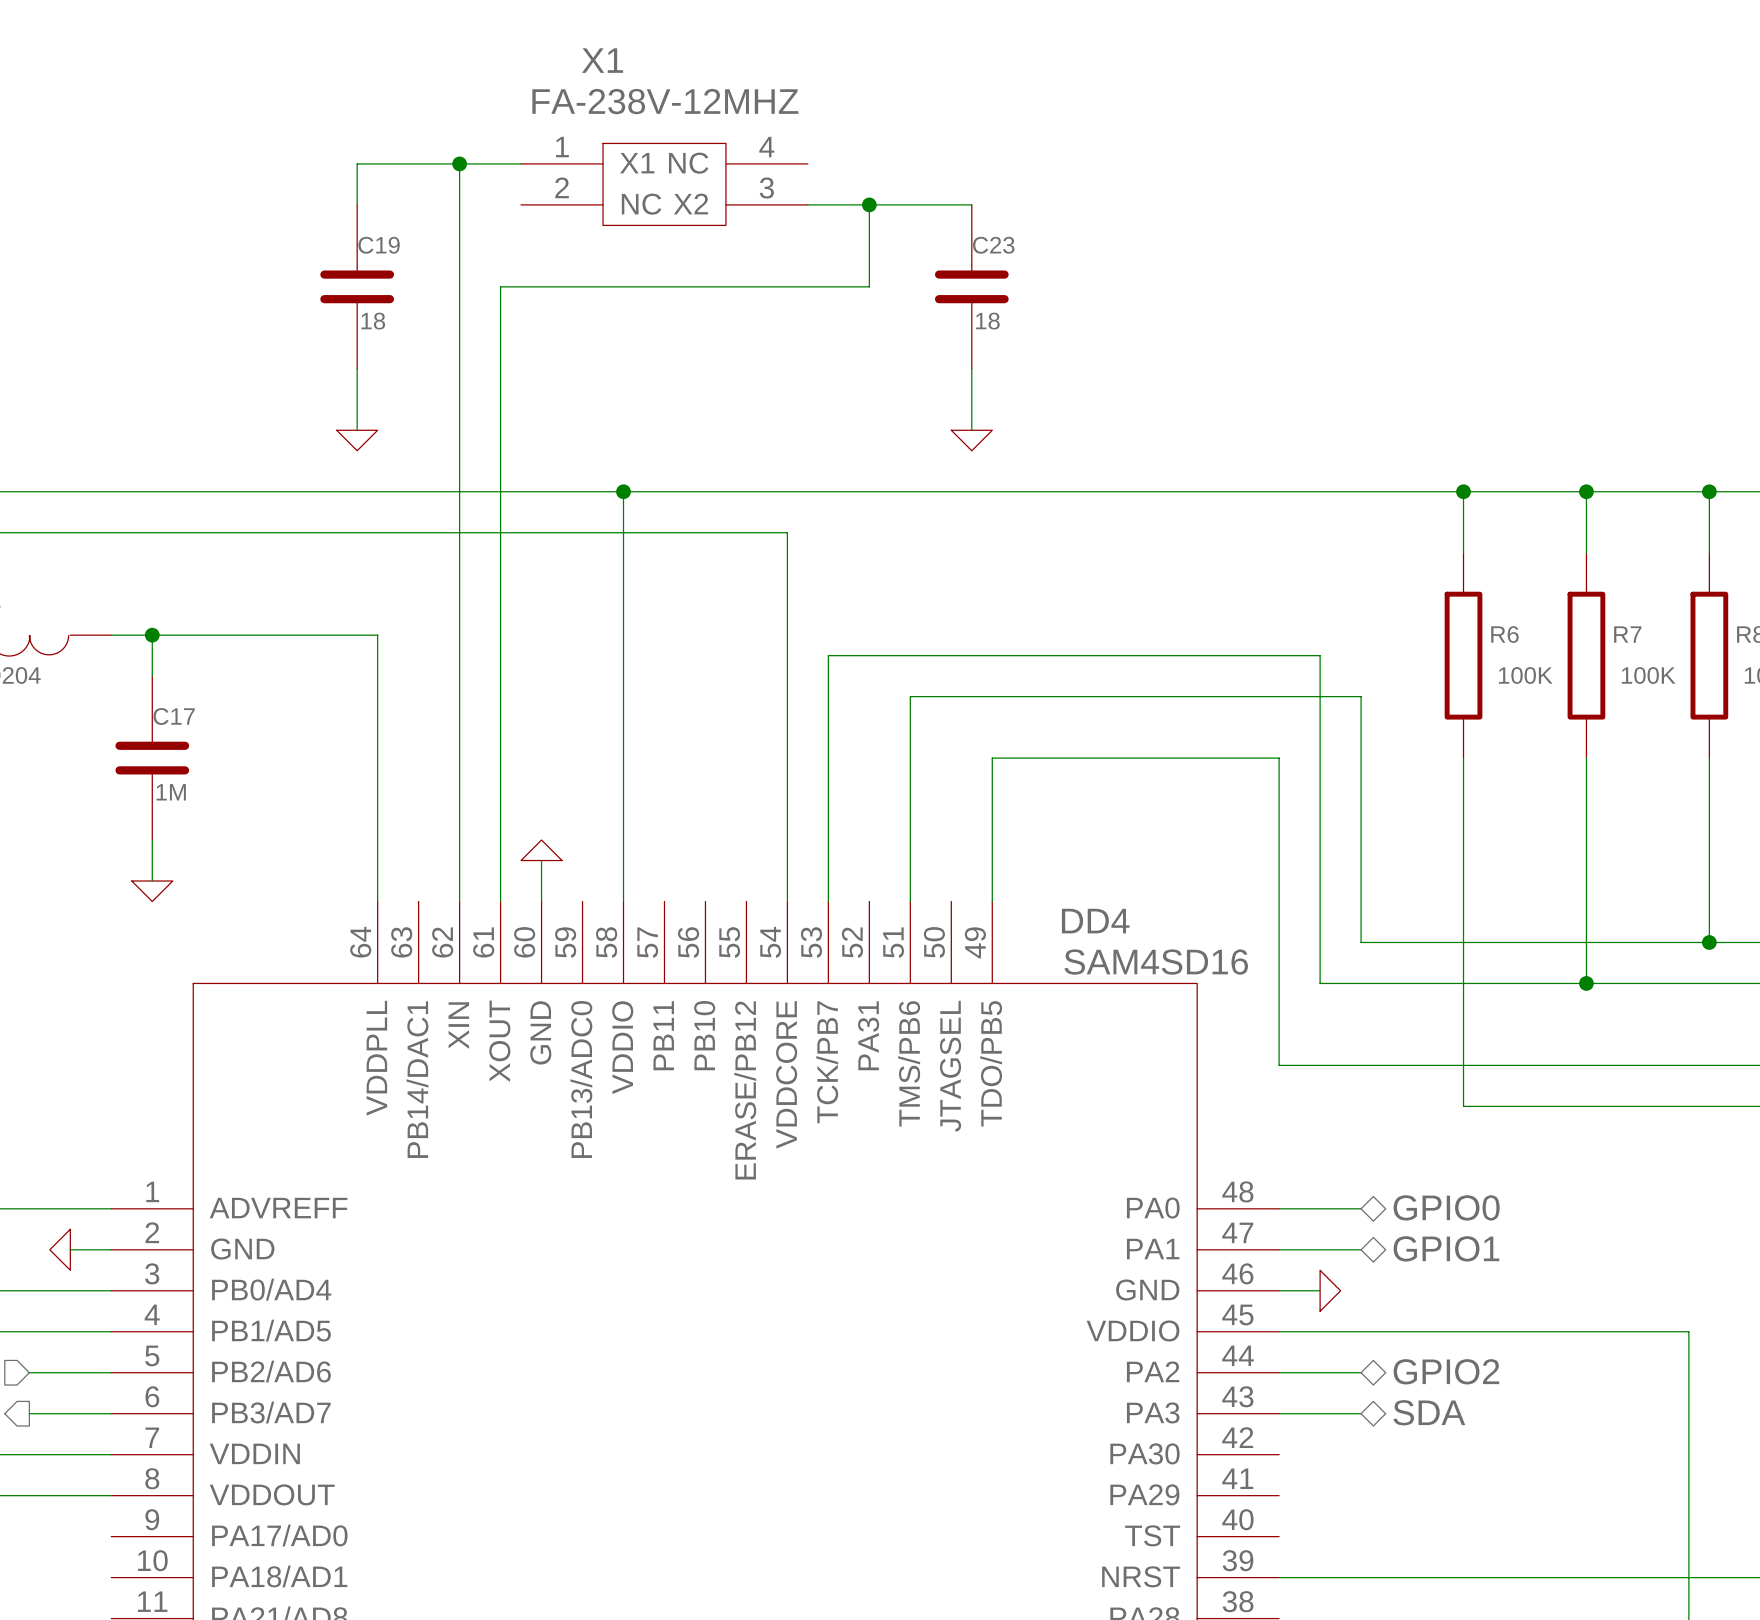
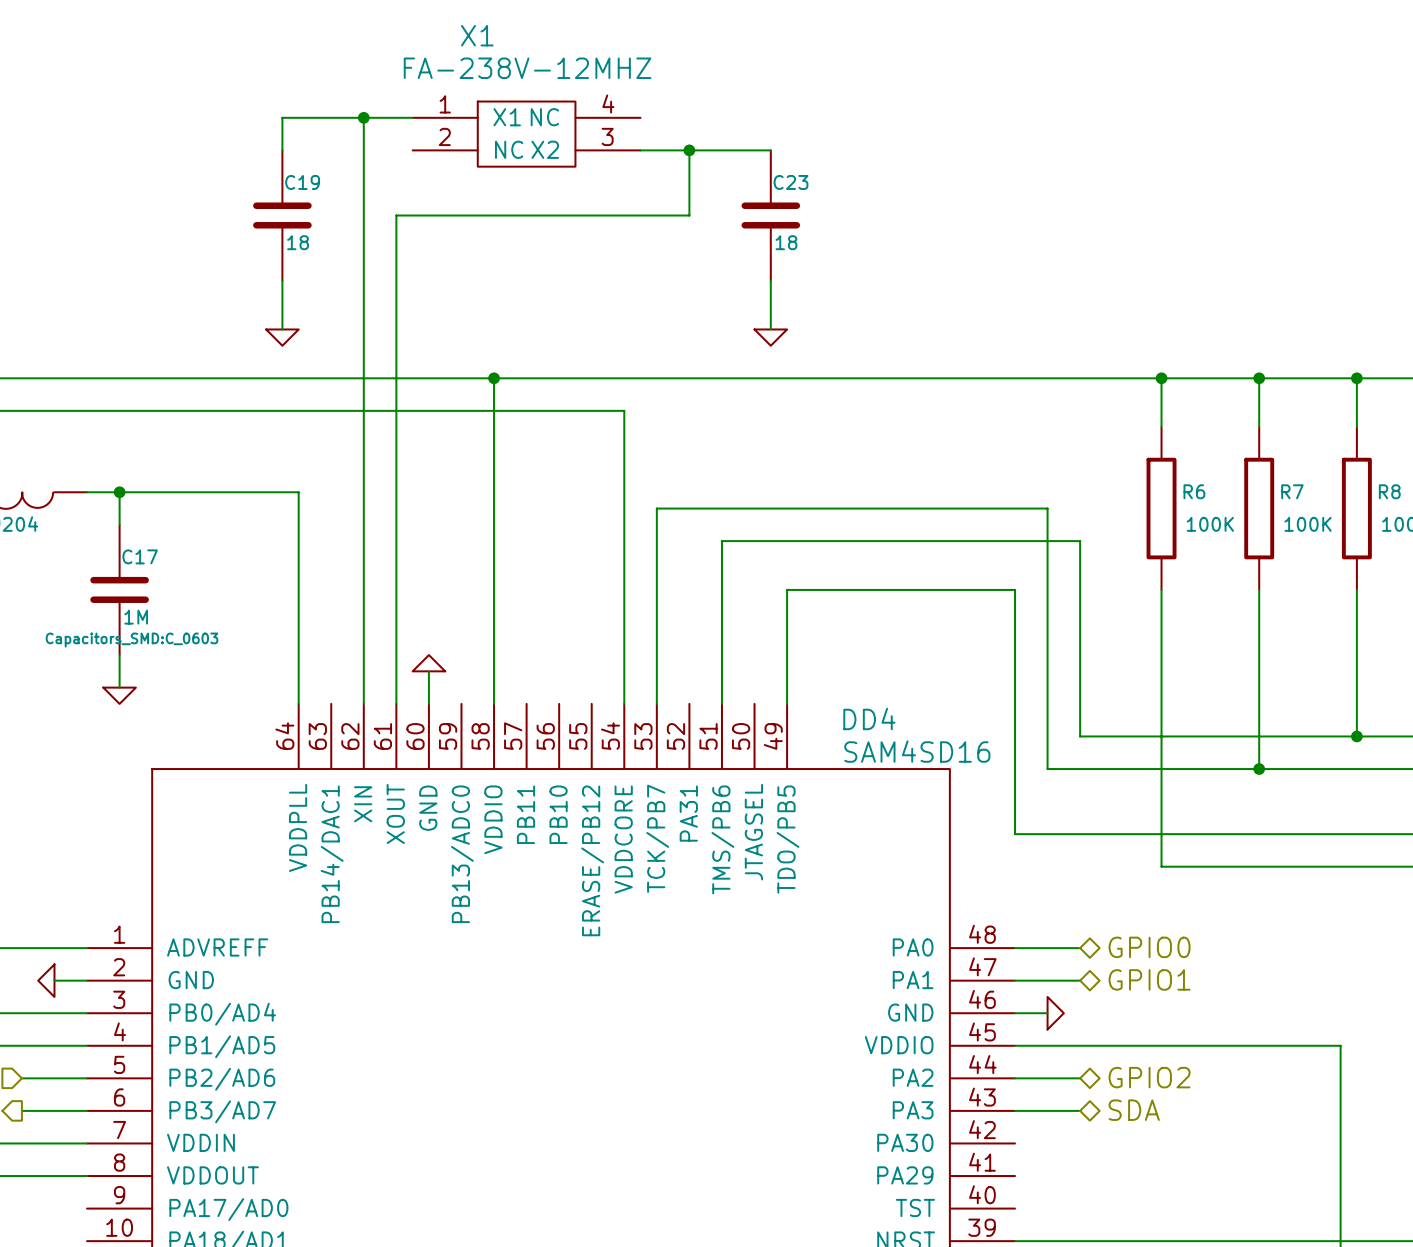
C17 text: none -> Capacitors_SMD:C_0603 (131, 640)

